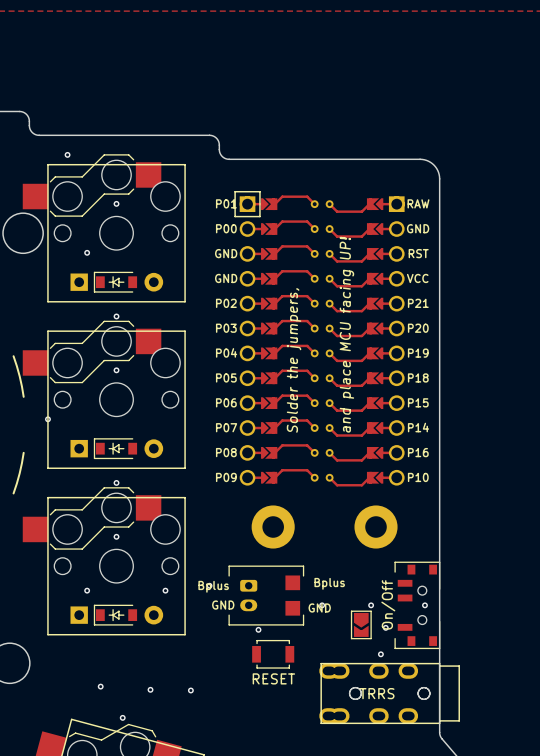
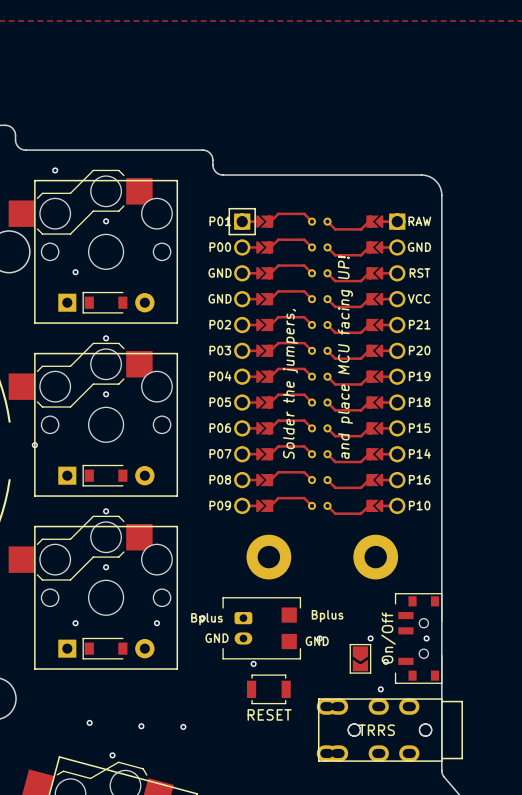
part footprint: [70, 271, 164, 293] -> [58, 291, 155, 314]
part footprint: [70, 438, 164, 460] -> [58, 464, 155, 487]
part footprint: [70, 604, 164, 626] -> [58, 637, 155, 660]

